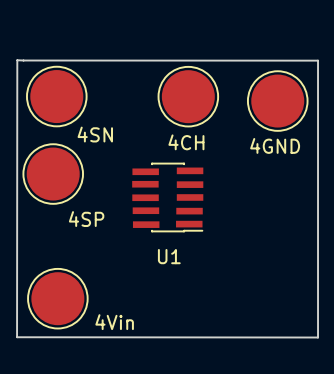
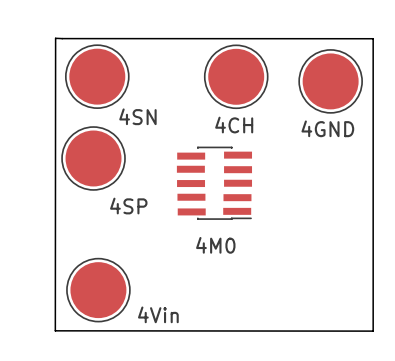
U1 name: U1 (169, 256) -> 4M0 (215, 245)

